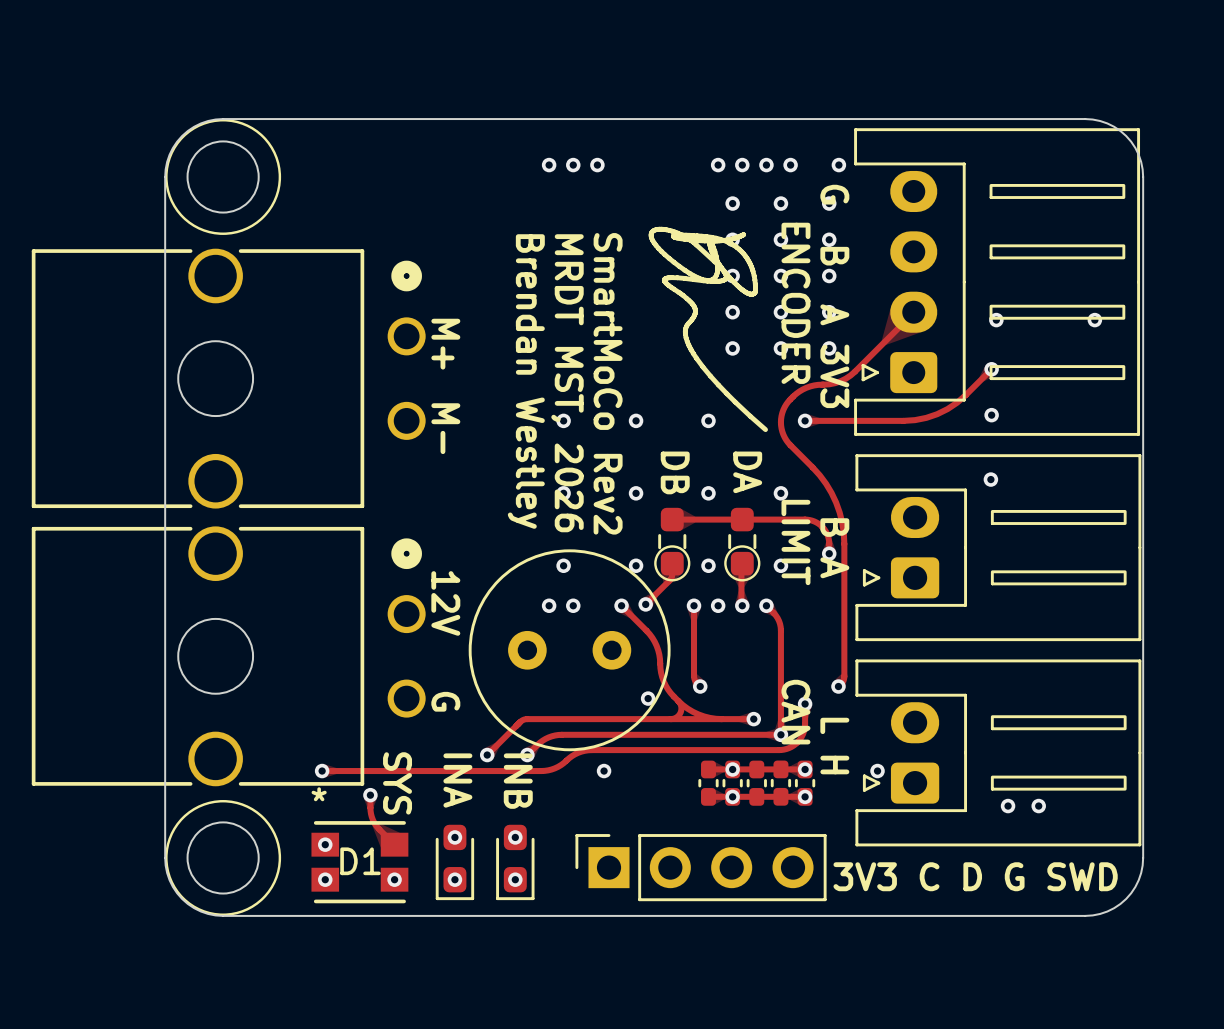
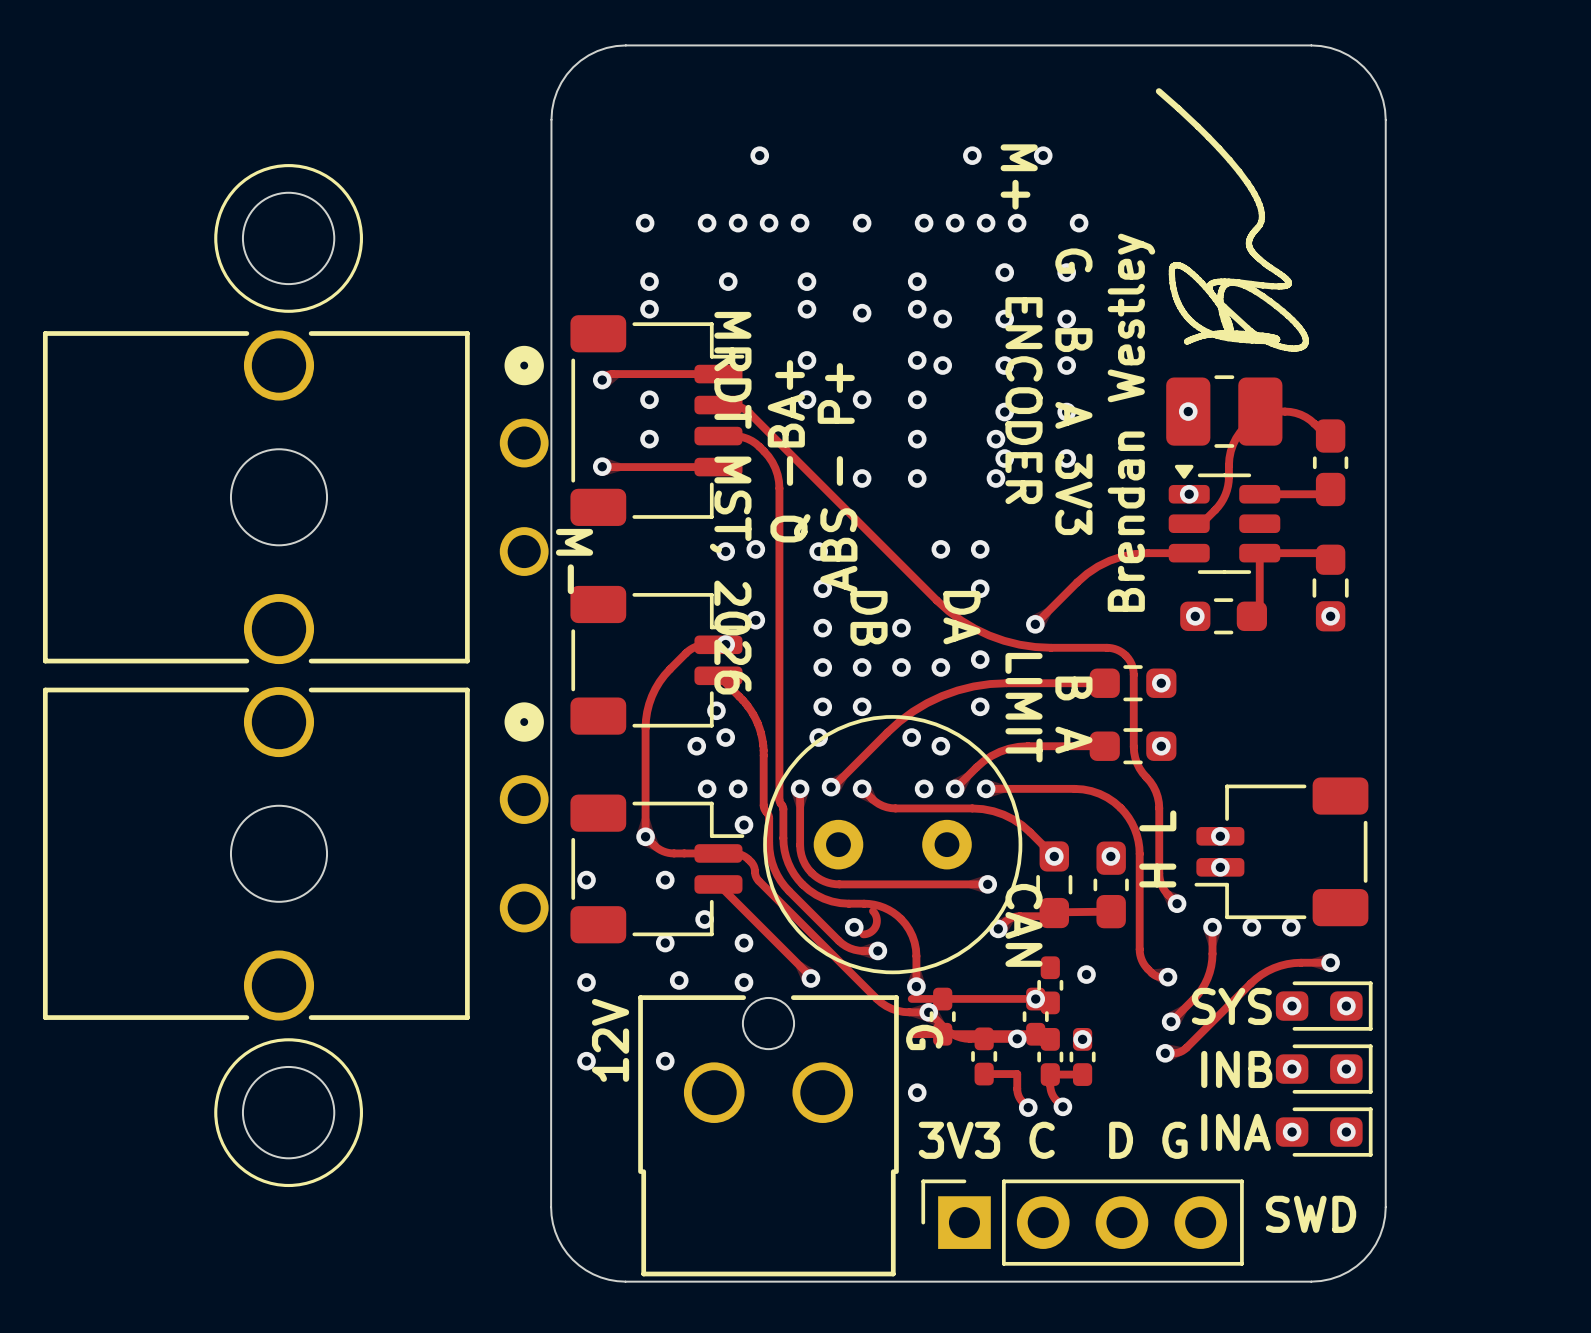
drawing: none -> [1155, 88, 1310, 352]
via: none -> (759, 155)
via: none -> (972, 155)
via: none -> (1043, 155)
board edge: (223, 119) (1085, 119) (1107, 123) (1120, 131) (1135, 148) (1141, 161) (1143, 176) (1143, 857) (1141, 872) (1131, 893) (1120, 903) (1107, 911) (1085, 915) (223, 915) (200, 911) (187, 903) (177, 893) (169, 880) (165, 857) (165, 176) (169, 154) (182, 136) (200, 123) (223, 119) -> (625, 45) (597, 51) (573, 67) (557, 91) (551, 119) (551, 1207) (555, 1231) (562, 1246) (579, 1265) (593, 1274) (608, 1279) (625, 1281) (1311, 1281) (1330, 1279) (1348, 1271) (1363, 1259) (1375, 1244) (1383, 1226) (1385, 1207) (1385, 119) (1383, 100) (1375, 82) (1363, 67) (1348, 55) (1330, 47) (1311, 45) (625, 45)
via: none -> (645, 223)
via: none -> (800, 223)
via: none -> (862, 223)
via: (732, 203) -> none
via: none -> (649, 281)
via: none -> (728, 281)
via: none -> (806, 281)
via: none -> (917, 281)
drawing: [648, 226, 768, 433] -> none
via: none -> (649, 309)
via: none -> (806, 309)
via: none -> (917, 309)
via: none -> (862, 313)
via: none -> (806, 360)
via: none -> (917, 360)
track: none -> (718, 374) (612, 374) (602, 380)
part: (997, 282) -> none
via: none -> (602, 380)
via: none -> (649, 399)
via: none -> (806, 399)
via: none -> (862, 399)
via: none -> (917, 399)
track: none -> (718, 405) (735, 405) (747, 411) (936, 600) (961, 620) (989, 635) (1019, 644) (1051, 647) (1109, 647) (1119, 650) (1125, 655) (1133, 671) (1135, 757) (1139, 768) (1153, 786) (1158, 802) (1159, 879) (1164, 890) (1177, 903)
via: none -> (1188, 411)
part: none -> (1224, 411)
via: (732, 312) -> none
track: (913, 312) (850, 375) (835, 383) (814, 385) (802, 389) (788, 401) (781, 415) (781, 428) (784, 437) (826, 483) (836, 502) (842, 522) (844, 543) (844, 676) (838, 686) -> none
part: none -> (657, 420)
text: none -> -BA+ (786, 423)
via: (996, 320) -> none
via: (1094, 320) -> none
text: none -> - P+ (836, 424)
track: none -> (1325, 429) (1326, 435) (1310, 420) (1295, 412) (1260, 411) (1236, 438) (1229, 458) (1228, 481) (1225, 494) (1218, 506) (1201, 523)
track: none -> (718, 436) (743, 437) (755, 443) (772, 462) (778, 481) (779, 799) (783, 808) (783, 844) (788, 863) (798, 879) (816, 894) (840, 903) (879, 905) (893, 912) (901, 919) (909, 929) (914, 942) (916, 986)
via: none -> (649, 439)
via: none -> (917, 439)
via: none -> (995, 439)
text position: M+ (445, 344) -> M+ (1019, 176)
via: (732, 348) -> none
part: none -> (1330, 462)
track: none -> (602, 466) (718, 467)
via: none -> (602, 466)
via: none -> (862, 478)
via: none -> (917, 478)
via: none -> (995, 478)
track: (991, 369) (957, 402) (947, 409) (926, 417) (903, 420) (805, 420) -> none
via: (991, 369) -> none
track: none -> (1330, 489) (1319, 494) (1259, 494)
via: none -> (1189, 494)
text rotation: 0° (526, 381) -> 180° (1131, 422)
text: SmartMoCo Rev2 (608, 383) -> none
part: none -> (1224, 519)
text: none -> Q (790, 528)
via: (991, 415) -> none
via: none -> (755, 549)
via: none -> (980, 549)
text: none -> ABS (838, 550)
via position: (708, 420) -> (940, 549)
via: (805, 420) -> none
track: none -> (1189, 553) (1134, 554) (1109, 560) (1087, 573) (1035, 624)
track: none -> (1324, 553) (1259, 553) (1259, 608)
via: none -> (822, 588)
via: none -> (980, 588)
part: none -> (1330, 588)
via: none -> (1195, 616)
part: none -> (1223, 616)
via: none -> (1330, 616)
via: none -> (755, 620)
via: none -> (1035, 624)
via: (990, 479) -> none
track: none -> (718, 644) (700, 645) (688, 651) (664, 675) (651, 696) (647, 711) (645, 728) (645, 836) (658, 848) (668, 852) (735, 853) (745, 857) (753, 864) (758, 881) (886, 1006) (903, 1011) (928, 1012) (948, 1031) (960, 1037) (1017, 1038)
via position: (636, 493) -> (822, 628)
via position: (708, 493) -> (901, 628)
via: (780, 493) -> none
part: none -> (657, 660)
via: none -> (980, 659)
via: none -> (822, 667)
via: none -> (862, 667)
via: none -> (901, 667)
via: none -> (940, 667)
track: none -> (718, 675) (747, 706) (760, 733) (763, 750) (763, 806) (768, 816) (769, 849) (777, 875) (789, 891) (842, 943) (854, 949) (877, 950)
track: (672, 519) (809, 520) (818, 523) (826, 531) (829, 540) (829, 553) -> none
track: none -> (1104, 683) (990, 684) (957, 690) (942, 696) (912, 711) (899, 721) (831, 788)
part: none -> (1133, 683)
via: none -> (1161, 683)
via: none -> (822, 706)
via: none -> (862, 706)
part: (672, 541) -> none
part: (742, 541) -> none
via: none -> (980, 706)
via: none -> (716, 710)
drawing: [654, 545, 691, 582] -> none
drawing: [724, 545, 761, 582] -> none
part: (998, 547) -> none
via: (829, 553) -> none
track: (741, 563) (742, 605) -> (1104, 746) (1027, 746) (1009, 748) (983, 761) (955, 788)
via: (780, 565) -> none
track: (672, 570) (670, 579) (645, 604) -> none
via: none -> (696, 746)
via: none -> (940, 746)
part: none -> (1133, 746)
via: none -> (1161, 746)
text rotation: 0° (445, 603) -> 180° (610, 1040)
text position: 12V (445, 603) -> 12V (610, 1040)
track: (621, 605) (654, 641) (659, 654) (662, 677) (670, 693) (692, 711) (709, 717) (722, 719) -> (800, 788) (801, 855) (808, 869) (820, 879) (839, 884) (987, 884)
track: none -> (862, 788) (878, 803) (891, 808) (972, 808) (1003, 814) (1022, 825) (1054, 856)
track: (694, 605) (694, 677) (700, 686) -> none
via position: (694, 605) -> (862, 788)
track: (766, 605) (777, 618) (780, 627) (780, 734) (558, 734) (542, 740) (527, 755) -> (986, 788) (1083, 789) (1099, 793) (1120, 807) (1134, 828) (1139, 847) (1140, 957) (1145, 966) (1153, 974) (1167, 977)
via: none -> (744, 824)
via: none -> (1220, 836)
via: none -> (645, 836)
part position: (569, 650) -> (892, 844)
text: none -> H L (1157, 848)
part: none -> (1281, 851)
via: none -> (1054, 856)
via: none -> (1110, 856)
via: none -> (1220, 867)
part: none -> (657, 868)
via: none -> (586, 880)
via: none -> (665, 880)
track: none -> (718, 884) (810, 978)
via: none -> (987, 884)
part: none -> (1054, 884)
part: none -> (1111, 884)
via: (700, 686) -> none
via: (838, 686) -> none
via: none -> (1177, 903)
via position: (648, 698) -> (854, 927)
text position: G (445, 701) -> G (924, 1037)
track: none -> (1111, 911) (1059, 912) (1054, 916) (1015, 916) (1007, 919) (998, 928)
track: (805, 704) (804, 727) (801, 737) (793, 745) (781, 749) (588, 750) (575, 754) (555, 768) (541, 771) (322, 771) -> none
via: (805, 704) -> none
via: none -> (704, 919)
track: none -> (1212, 927) (1212, 960) (1207, 978) (1197, 994) (1171, 1021)
via: none -> (1212, 927)
via: none -> (1251, 927)
via: none -> (1291, 927)
via: none -> (998, 928)
track: (753, 719) (526, 719) (520, 721) (487, 755) -> none
via: (753, 719) -> none
via: none -> (665, 943)
via: none -> (744, 943)
via: none -> (877, 950)
via: (780, 734) -> none
track: none -> (1330, 962) (1294, 963) (1267, 971) (1250, 983) (1184, 1049) (1178, 1052) (1165, 1053)
via: none -> (1330, 962)
text: L H (834, 746) -> none
via: none -> (1086, 974)
via: none -> (1167, 977)
part: (998, 752) -> none
via: none -> (810, 978)
via: (487, 755) -> none
via: none -> (586, 982)
via: none -> (744, 982)
part: none -> (1050, 985)
via: none -> (916, 986)
via position: (732, 769) -> (928, 1012)
via: (322, 771) -> none
via: (604, 771) -> none
via: (877, 771) -> none
via: none -> (1292, 1006)
part: none -> (1324, 1006)
via: none -> (1346, 1006)
text rotation: 0° (457, 780) -> 90° counterclockwise (1236, 1132)
text position: INA (457, 780) -> INA (1236, 1132)
text rotation: 0° (518, 781) -> 90° counterclockwise (1236, 1069)
text position: INB (518, 781) -> INB (1236, 1069)
text rotation: 0° (397, 783) -> 90° counterclockwise (1231, 1006)
text position: SYS (397, 783) -> SYS (1231, 1006)
part: (708, 783) -> none
part: (756, 783) -> none
part: (780, 783) -> none
via: none -> (1171, 1021)
track: (370, 795) (370, 810) (374, 822) (394, 844) -> none
via: (370, 795) -> none
via: (732, 796) -> none
via position: (805, 796) -> (1017, 1038)
via: none -> (1082, 1039)
via: (1008, 806) -> none
via: (1038, 806) -> none
via: none -> (1165, 1053)
part: none -> (984, 1056)
part: none -> (1050, 1056)
part: none -> (1082, 1056)
via: none -> (1292, 1069)
part: none -> (1324, 1069)
via: none -> (1346, 1069)
track: none -> (984, 1074) (1017, 1074) (1018, 1094) (1028, 1107)
track: none -> (1082, 1074) (1055, 1074) (1051, 1077) (1051, 1093) (1062, 1106)
via position: (454, 837) -> (586, 1061)
via position: (515, 837) -> (665, 1061)
via: none -> (917, 1092)
via: (325, 844) -> none
via: none -> (1062, 1106)
via: none -> (1028, 1107)
D1: (359, 862) -> none
part: (454, 862) -> none
part: (515, 862) -> none
part position: (701, 867) -> (1082, 1222)
via: none -> (1292, 1132)
part: none -> (1324, 1132)
via: none -> (1346, 1132)
part: none -> (768, 1135)
text: 3V3 C D G SWD (975, 876) -> 3V3 C D G (1053, 1140)
via: (325, 879) -> none
via: (394, 879) -> none
via: (454, 879) -> none
via: (515, 879) -> none
text: none -> SWD (1311, 1214)

